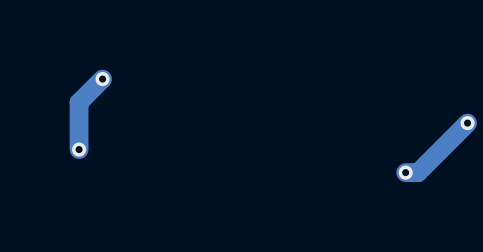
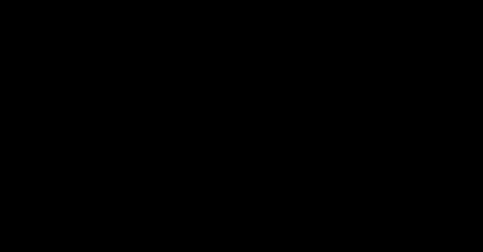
track: (102, 79) (79, 102) (79, 149) -> none
via: (102, 79) -> none
track: (467, 123) (418, 172) (405, 172) -> none
via: (467, 123) -> none
via: (79, 149) -> none
via: (405, 172) -> none

